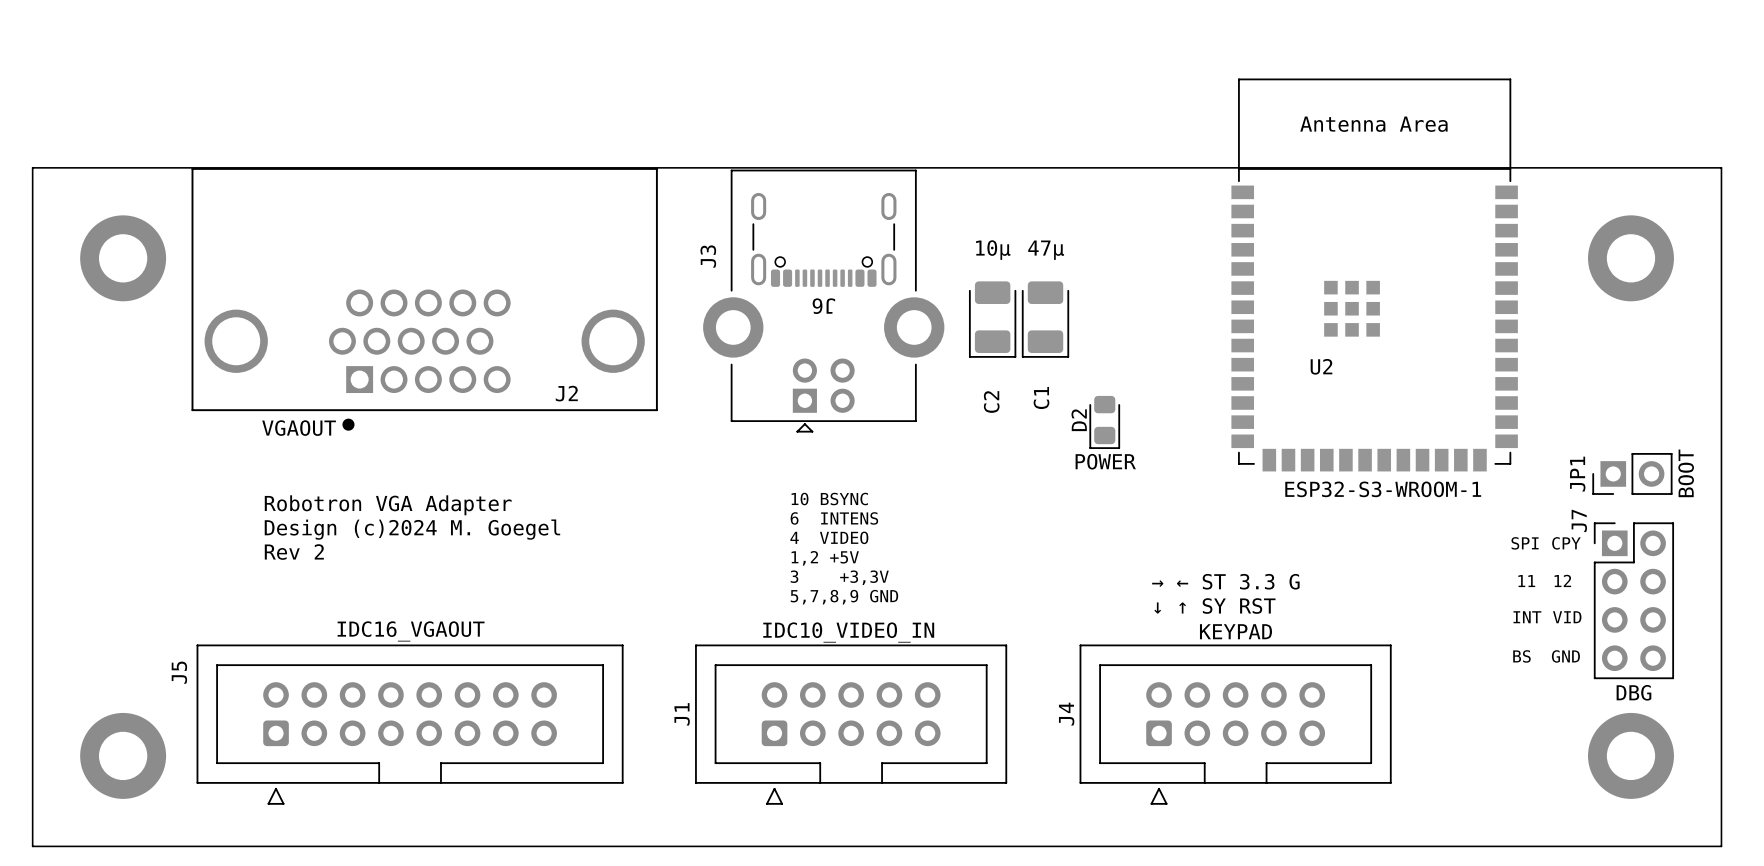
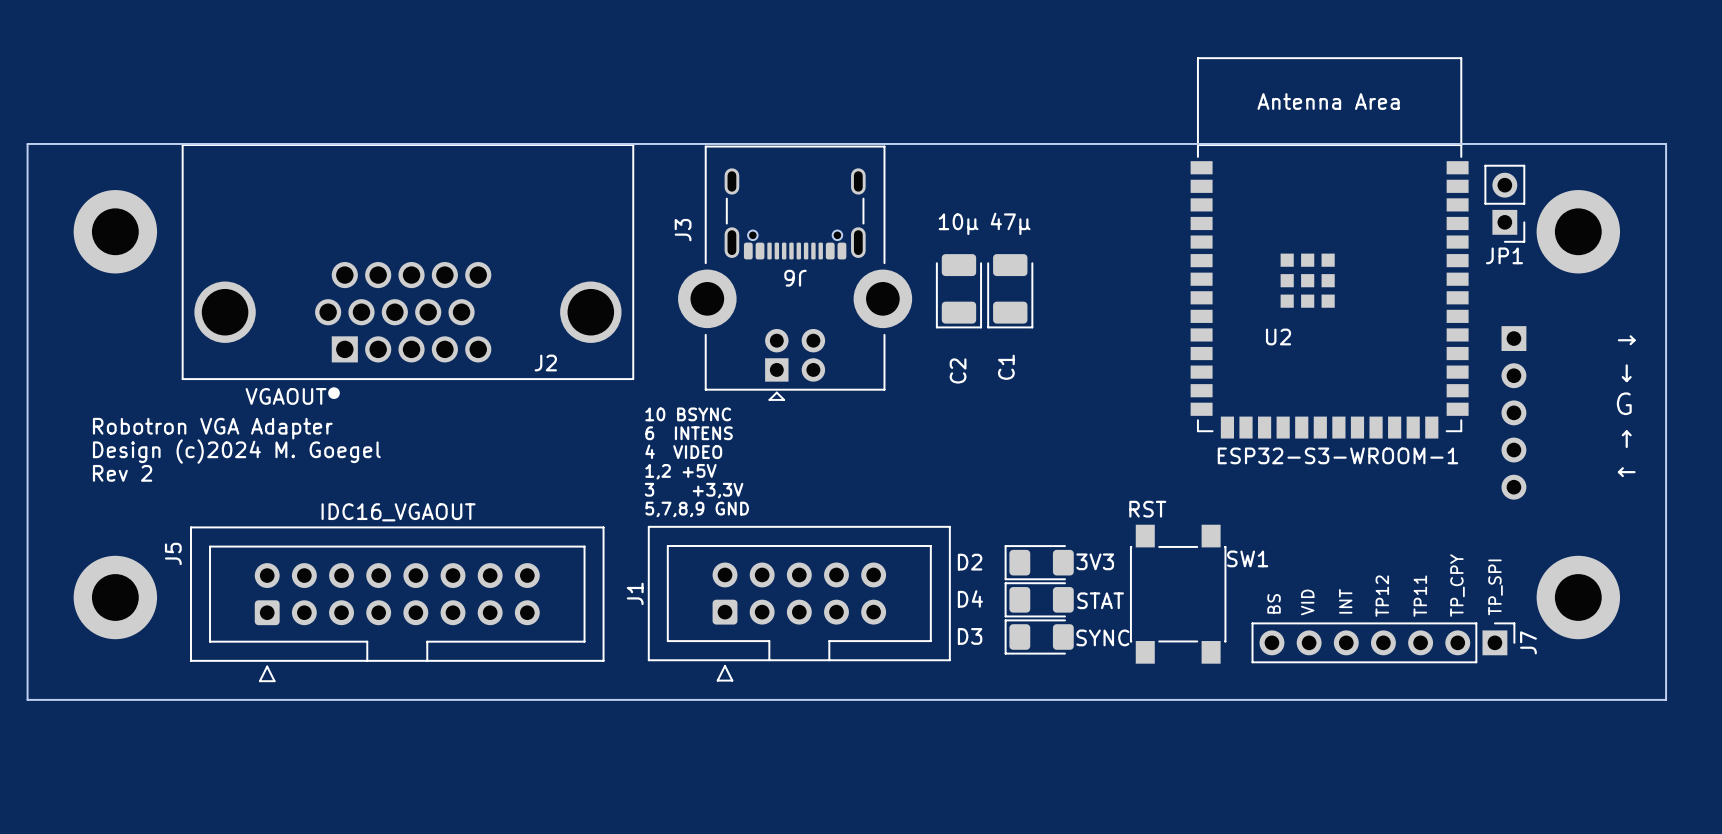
text: none -> → (1626, 340)
D2 footprint: [1089, 395, 1121, 449] -> [1004, 545, 1074, 581]
text: none -> ↓ (1626, 373)
D2 name position: D2 (1079, 420) -> D2 (970, 562)
text: none -> G (1624, 403)
part: none -> (1513, 412)
D2 value: POWER (1105, 461) -> 3V3 (1095, 561)
text: none -> ↑ (1626, 439)
JP1 rotation: 0° (1632, 473) -> 90° counterclockwise (1504, 203)
JP1 position: (1632, 473) -> (1504, 203)
JP1 value: BOOT (1686, 473) -> none
text position: 10 BSYNC (829, 499) -> 10 BSYNC (688, 414)
text position: Robotron VGA Adapter (388, 505) -> Robotron VGA Adapter (212, 428)
text: none -> ← (1626, 472)
text position: 6 INTENS (834, 518) -> 6 INTENS (689, 433)
J7 name position: J7 (1579, 520) -> J7 (1528, 642)
J7 footprint: [1593, 522, 1675, 680] -> [1251, 622, 1516, 664]
text position: Design (c)2024 M. Goegel (412, 529) -> Design (c)2024 M. Goegel (236, 451)
text position: 4 VIDEO (829, 537) -> 4 VIDEO (683, 451)
text: SPI (1525, 543) -> none
text: CPY (1566, 543) -> none
text position: Rev 2 (294, 552) -> Rev 2 (122, 473)
text position: 1,2 +5V (825, 558) -> 1,2 +5V (680, 471)
text position: 3 +3,3V (839, 577) -> 3 +3,3V (694, 490)
text: 12 (1562, 580) -> none
text: → ← ST 3.3 G (1225, 581) -> none
text: 11 (1526, 581) -> none
text position: 5,7,8,9 GND (844, 597) -> 5,7,8,9 GND (697, 509)
text: ↓ ↑ SY RST (1214, 606) -> none
text rotation: 0° (1527, 617) -> 90° counterclockwise (1345, 601)
text position: INT (1527, 617) -> INT (1345, 601)
text rotation: 0° (1567, 617) -> 90° counterclockwise (1307, 602)
text position: VID (1567, 617) -> VID (1307, 602)
text: none -> TP_CPY (1457, 585)
SW1: none -> RST (1178, 594)
J1 value: IDC10_VIDEO_IN (848, 632) -> none
text: none -> TP12 (1382, 596)
text: none -> TP11 (1420, 596)
D4: none -> STAT (1039, 599)
text rotation: 0° (1521, 656) -> 90° counterclockwise (1274, 603)
text position: BS (1521, 656) -> BS (1274, 603)
text: GND (1565, 656) -> TP_SPI (1495, 587)
D3: none -> SYNC (1039, 636)
J7 value: DBG (1633, 692) -> none
J5 position: (410, 724) -> (397, 604)
J1 position: (851, 724) -> (799, 603)
J4: KEYPAD (1235, 724) -> none
board edge: (32, 740) (32, 846) (1721, 846) (1721, 740) -> (27, 699) (1666, 699)
part position: (123, 755) -> (115, 597)
part position: (1630, 755) -> (1578, 597)

